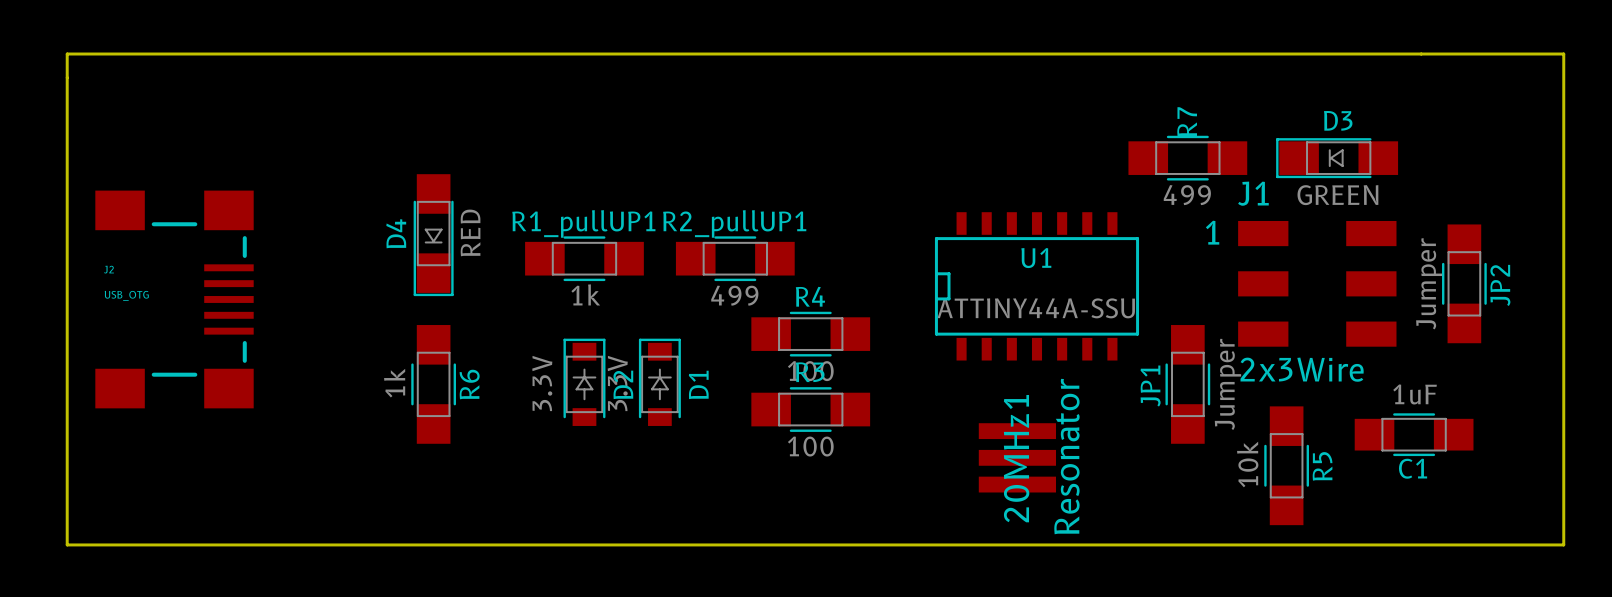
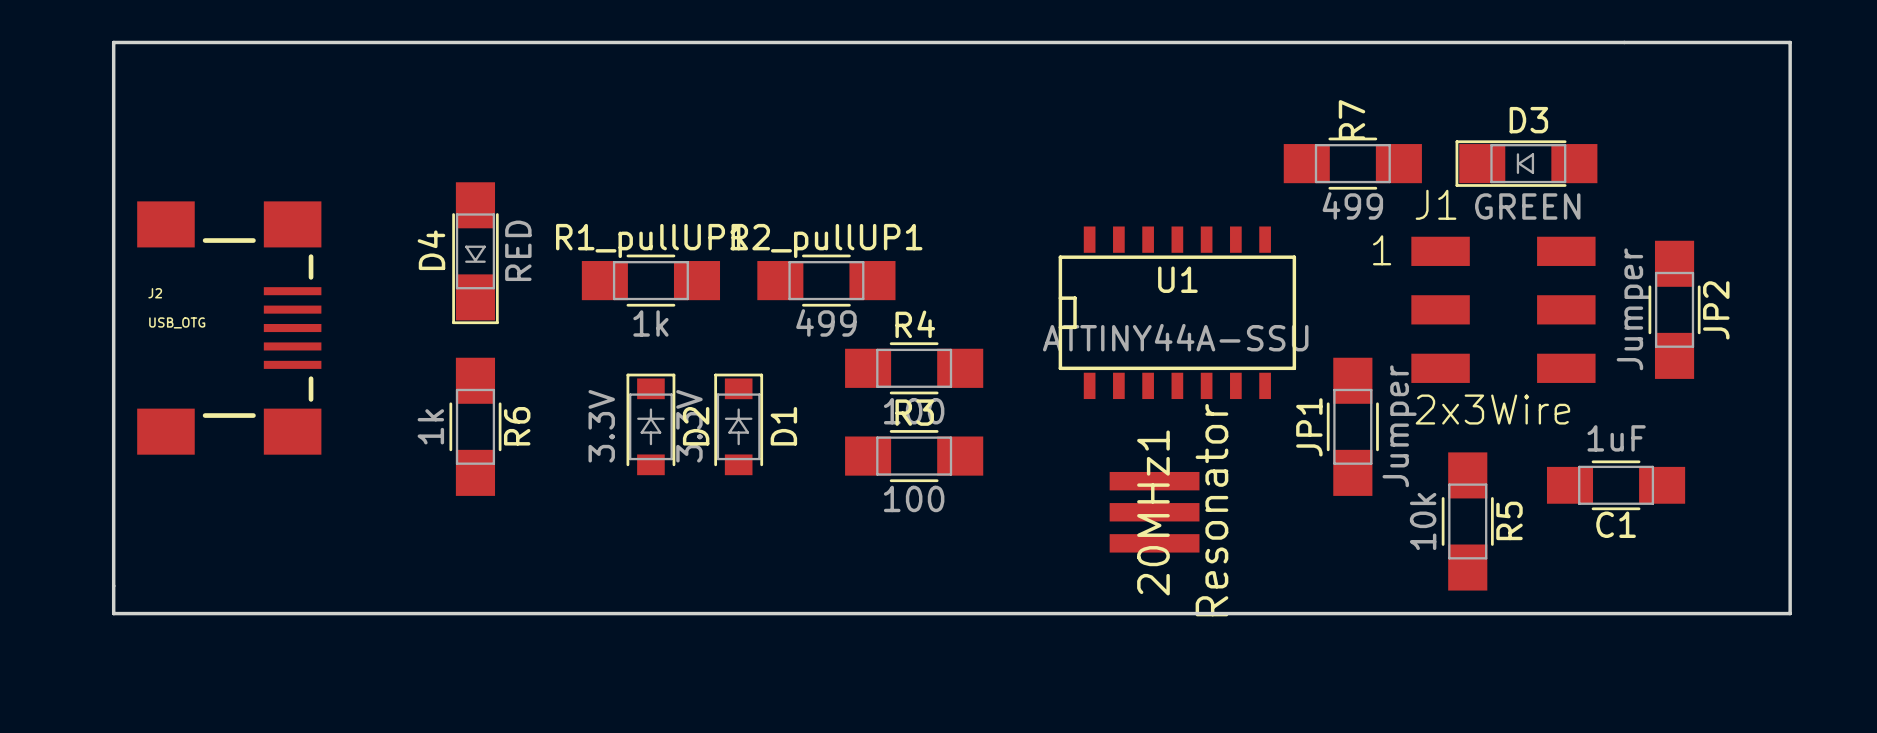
board edge: (122, 54) (67, 54) (67, 544) (122, 544) -> (113, 42) (113, 613)
J2 position: (174, 299) -> (229, 328)

